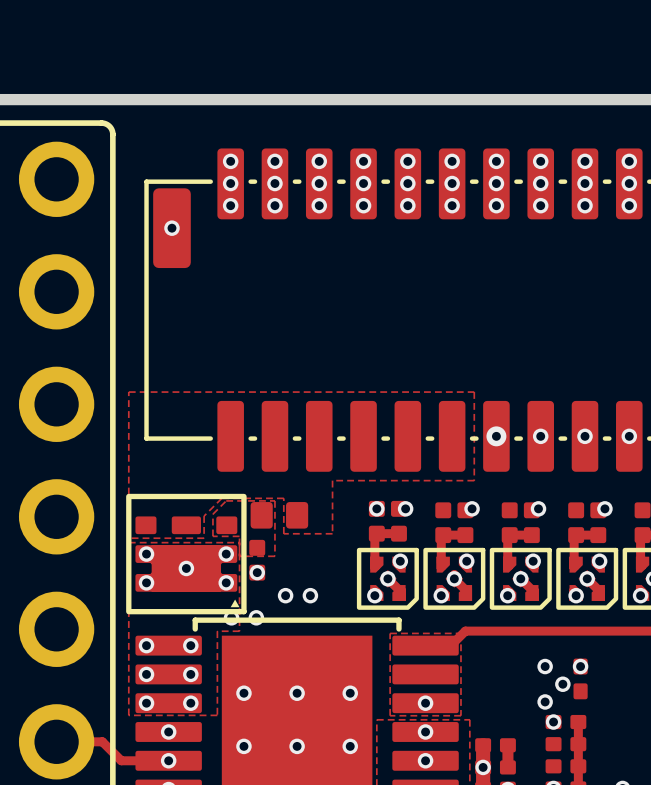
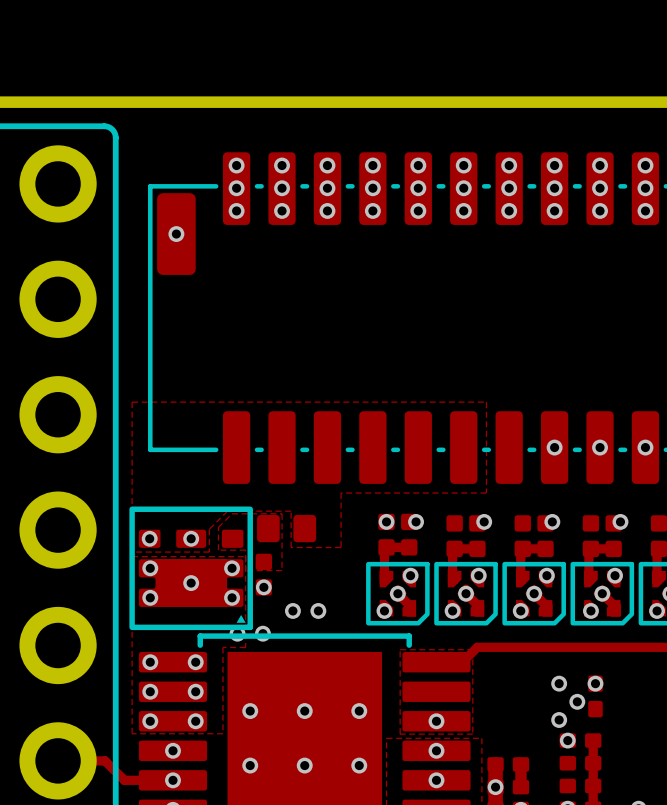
via: (496, 436) -> none
via: none -> (149, 538)
via: none -> (191, 538)

